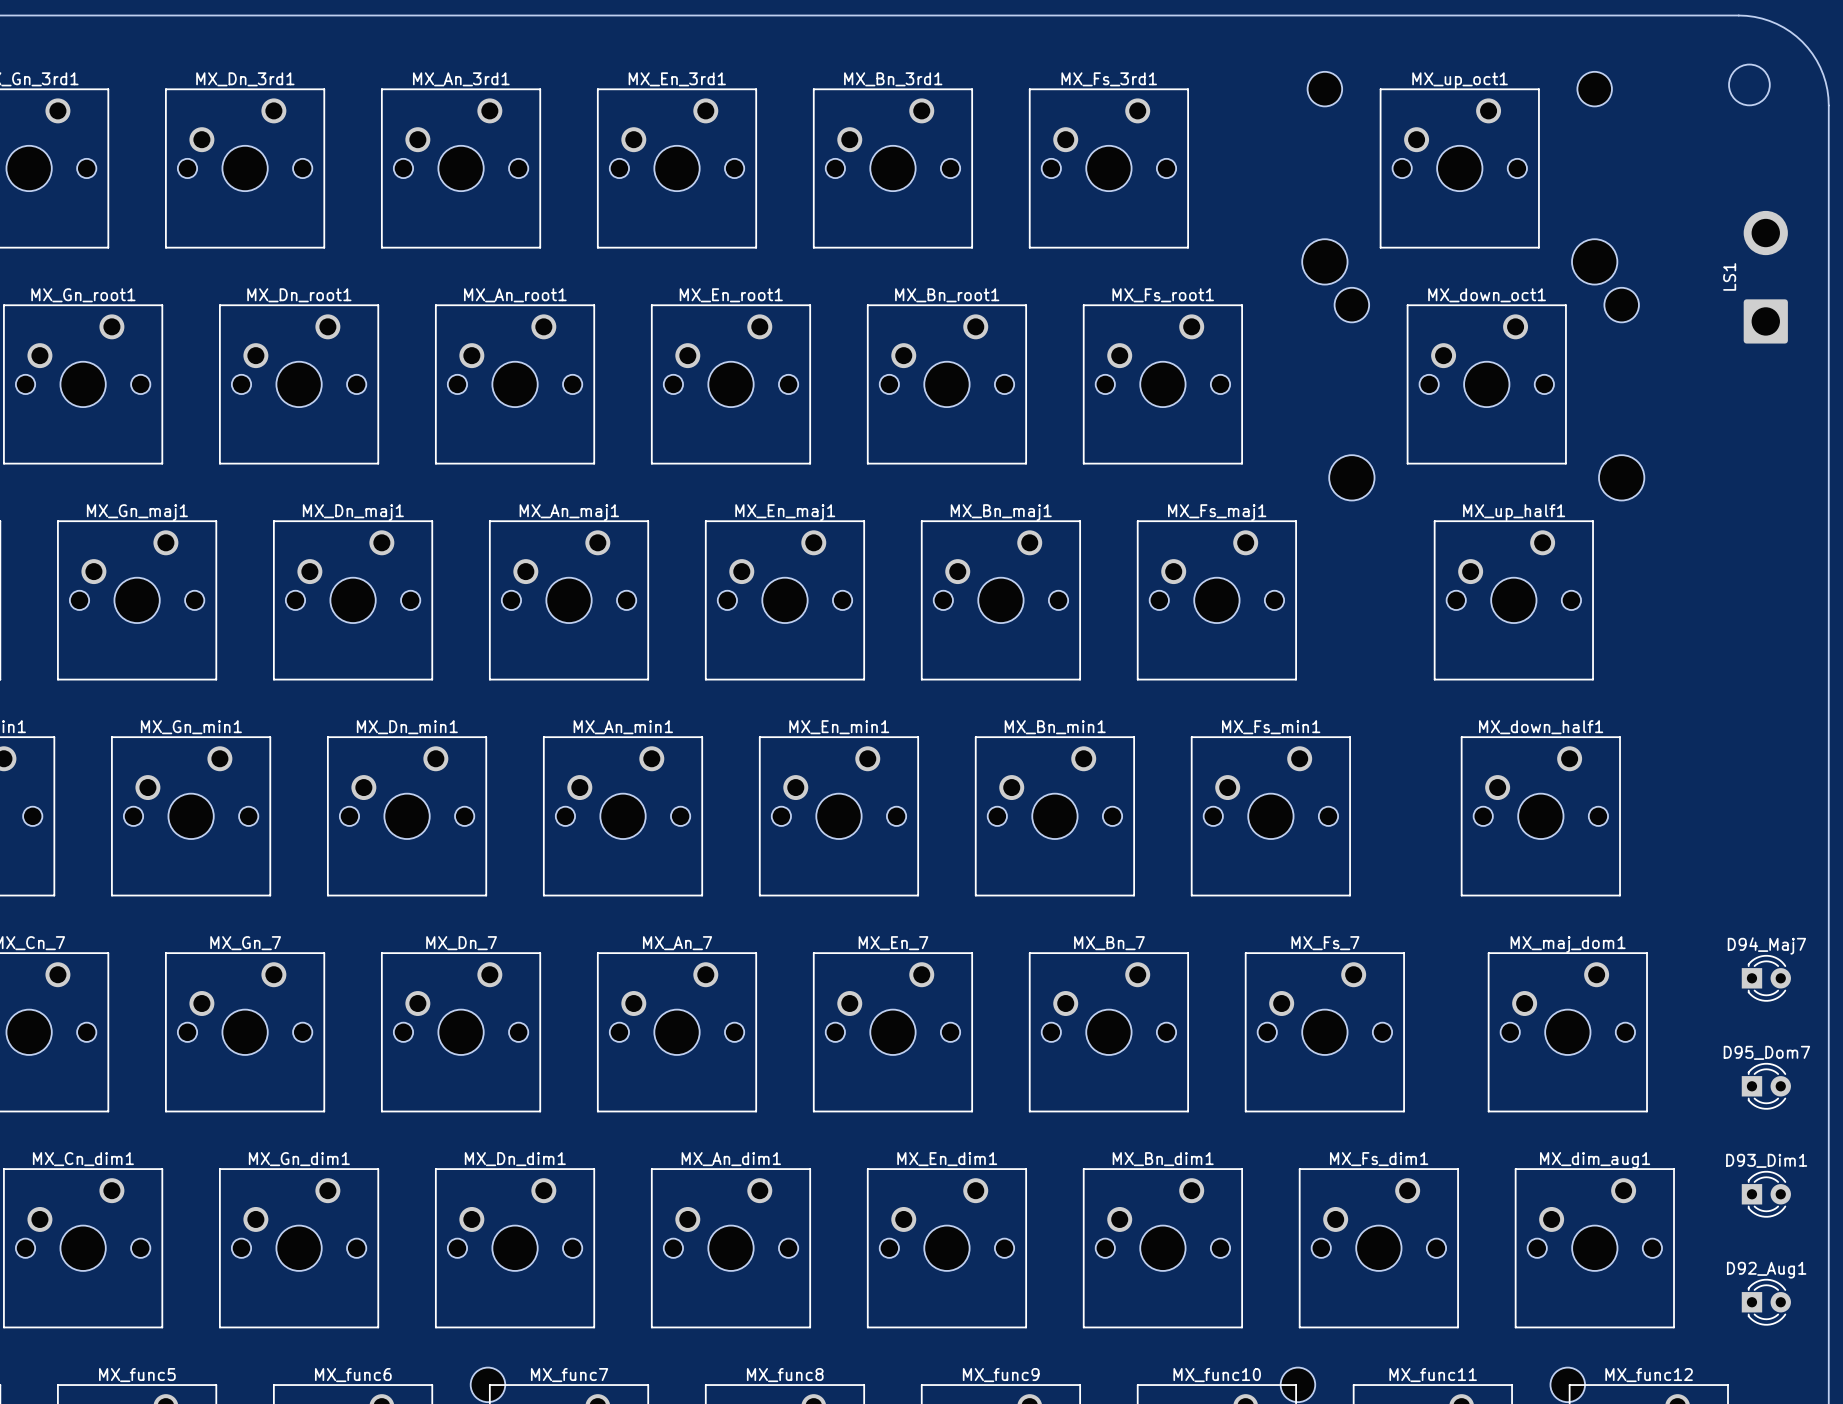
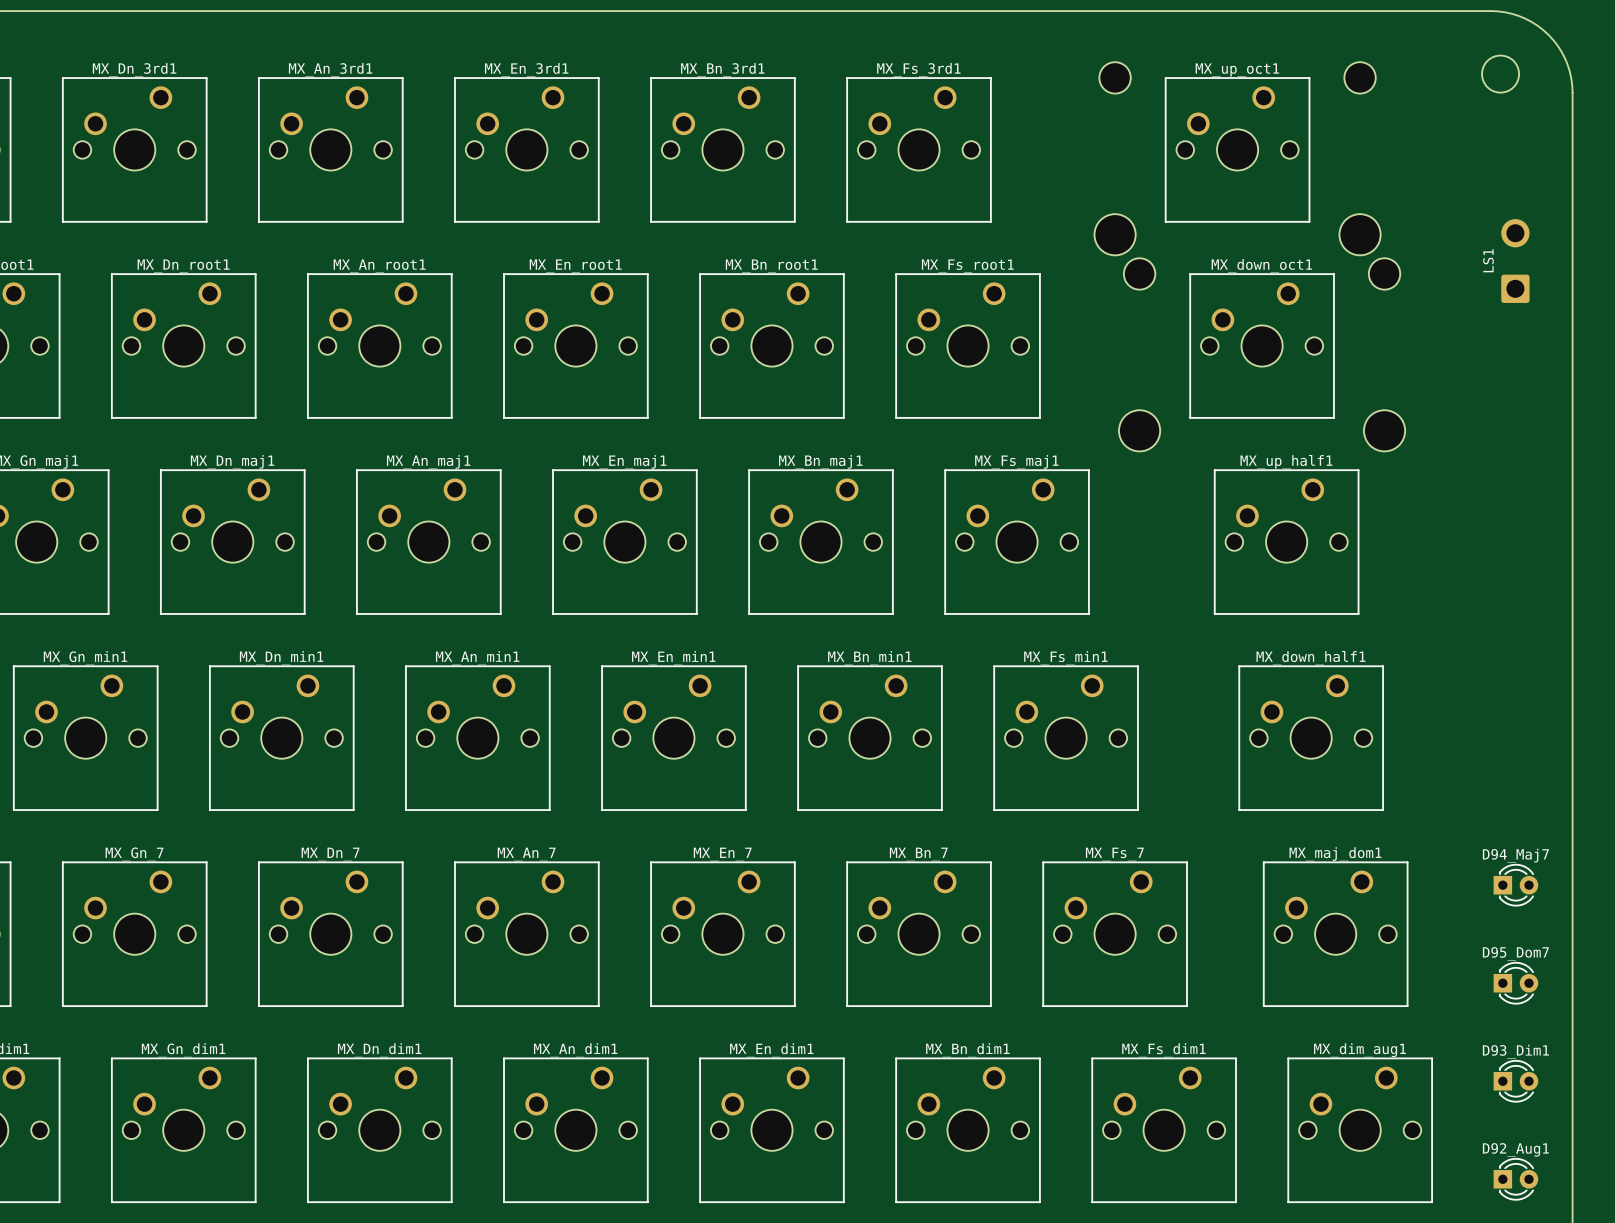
LS1 footprint: [1743, 210, 1788, 344] -> [1501, 219, 1530, 303]

